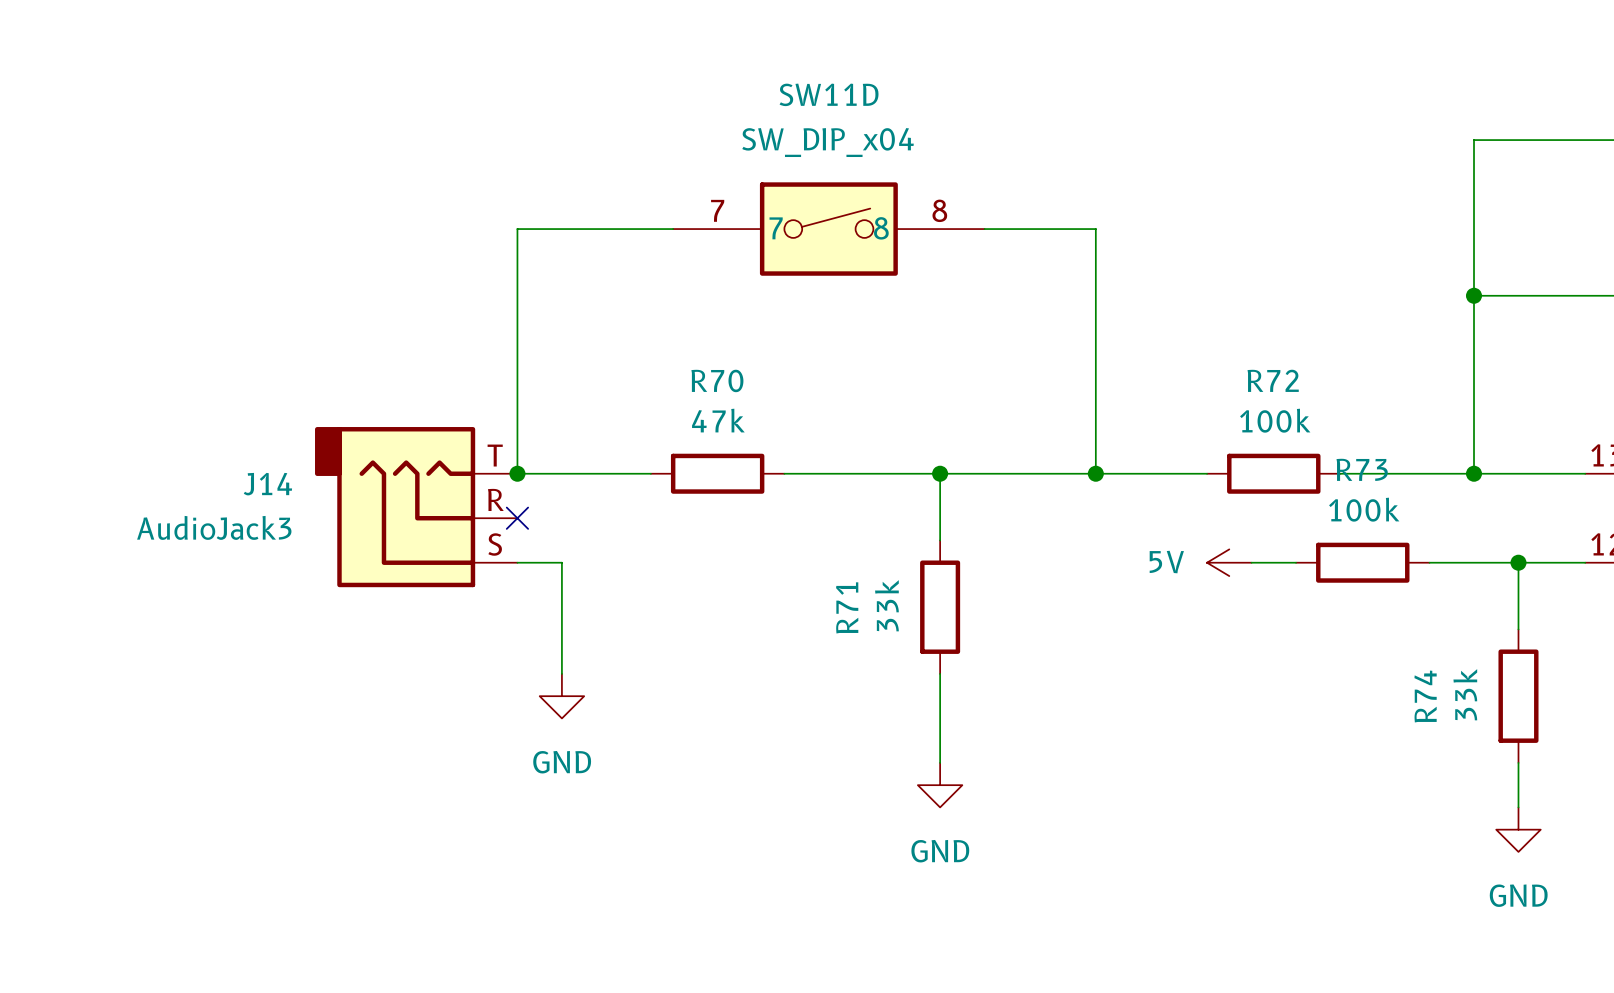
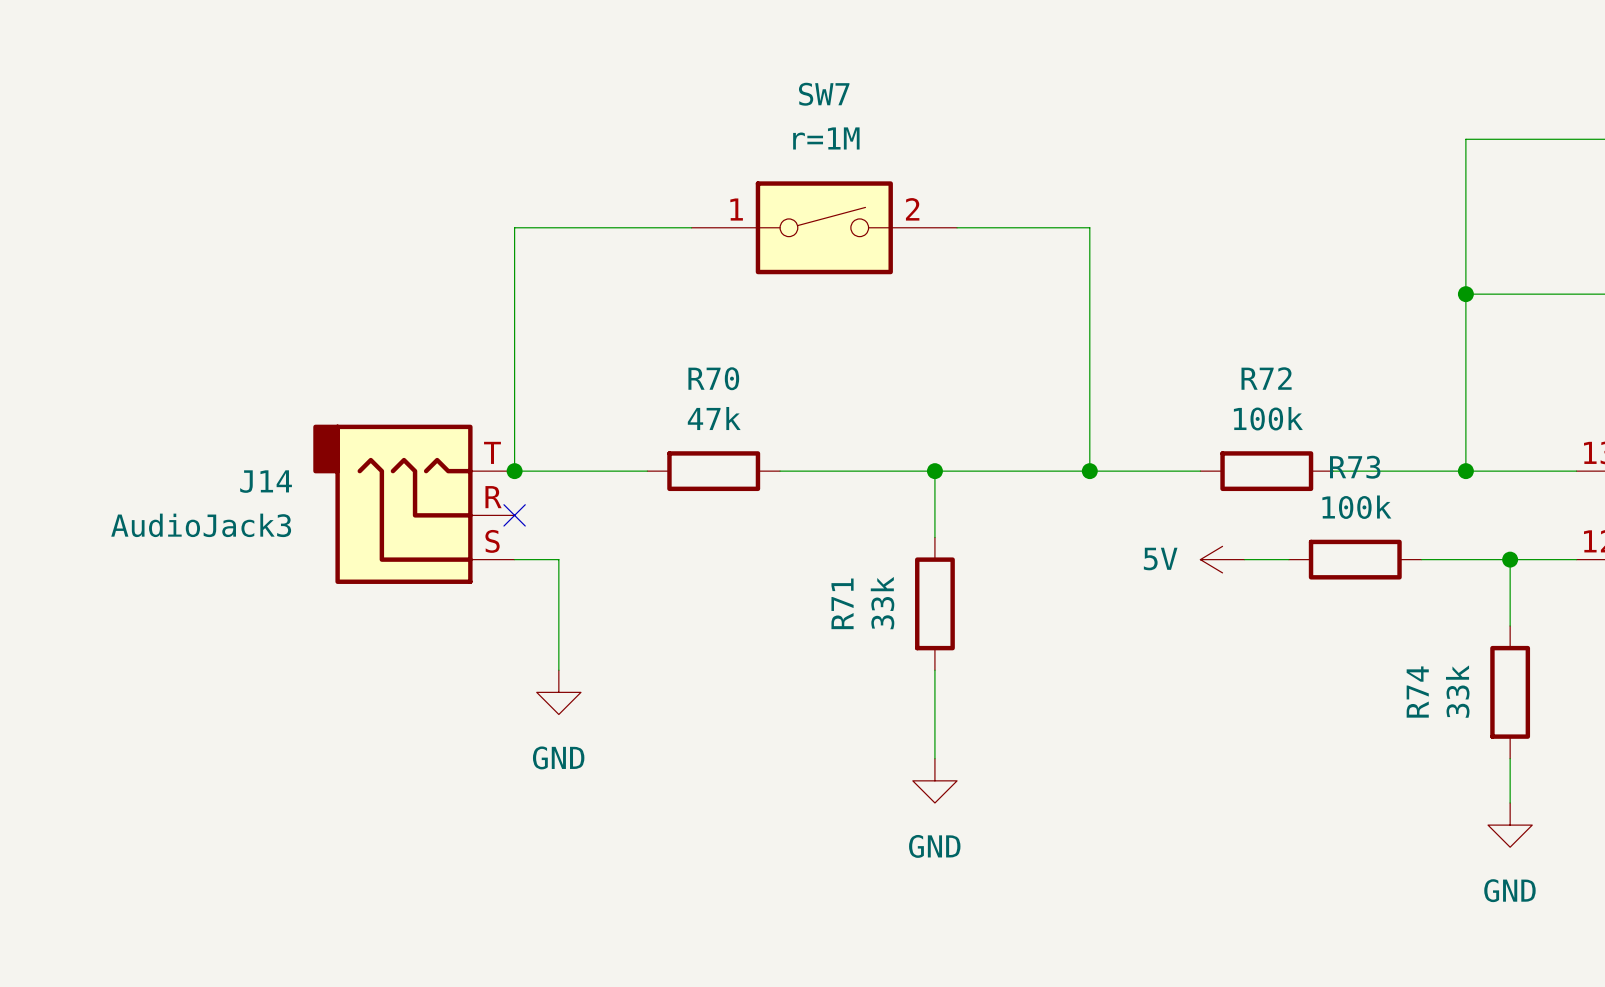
SW11D: SW_DIP_x04 (828, 229) -> none
SW7: none -> r=1M (824, 227)

